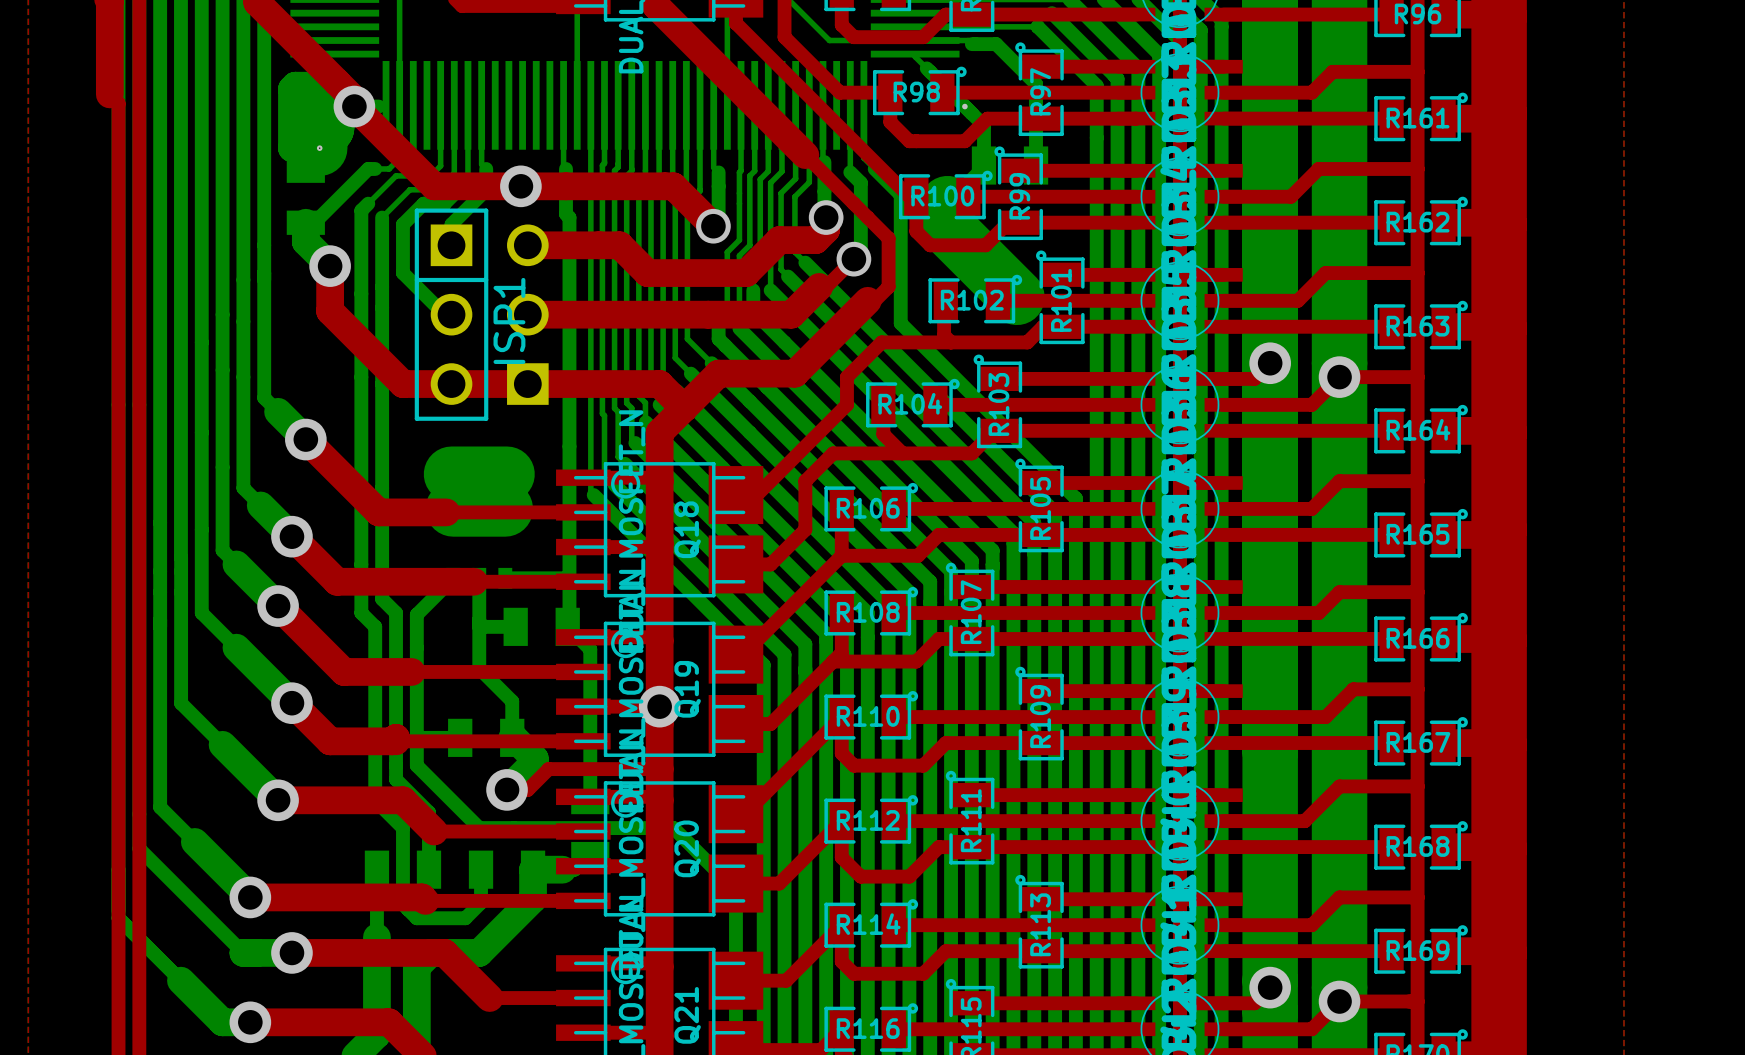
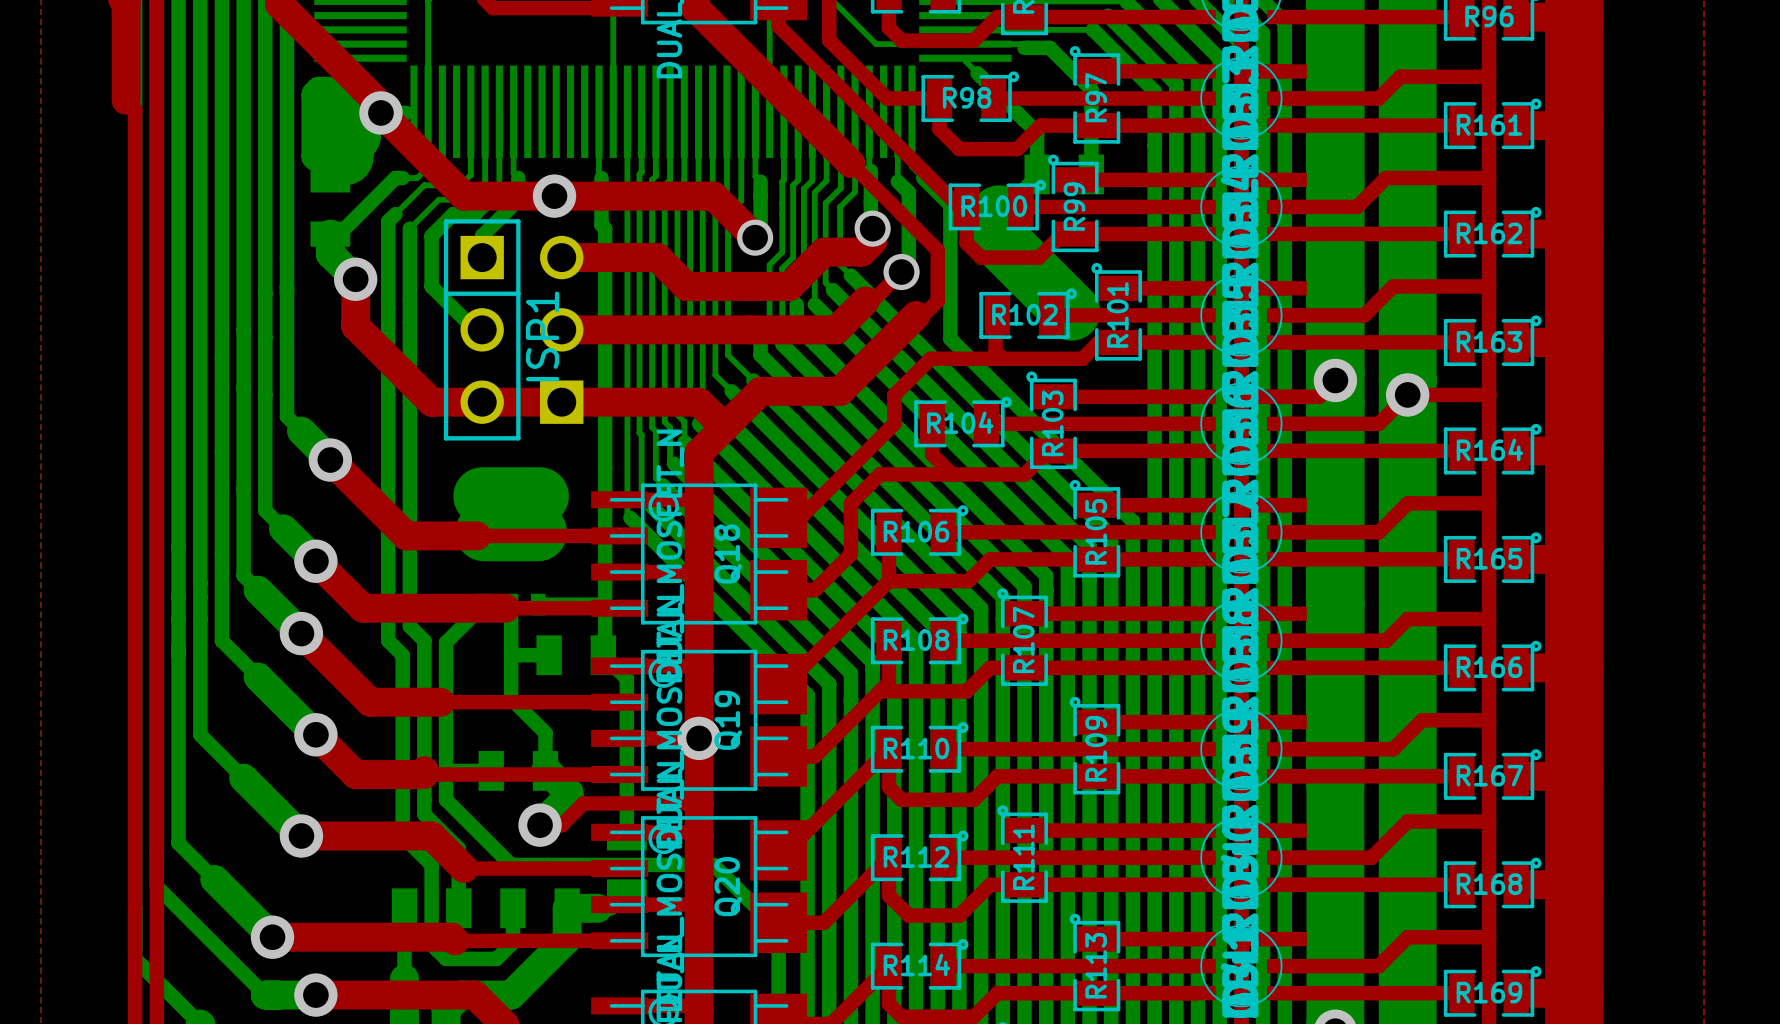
via: (964, 106) -> none
via: (319, 148) -> none

